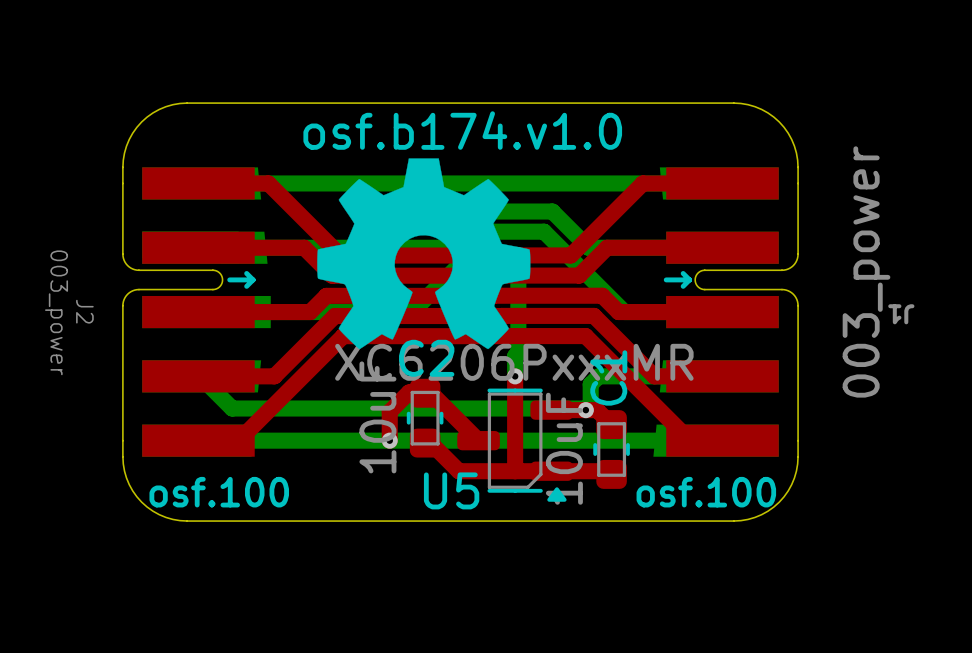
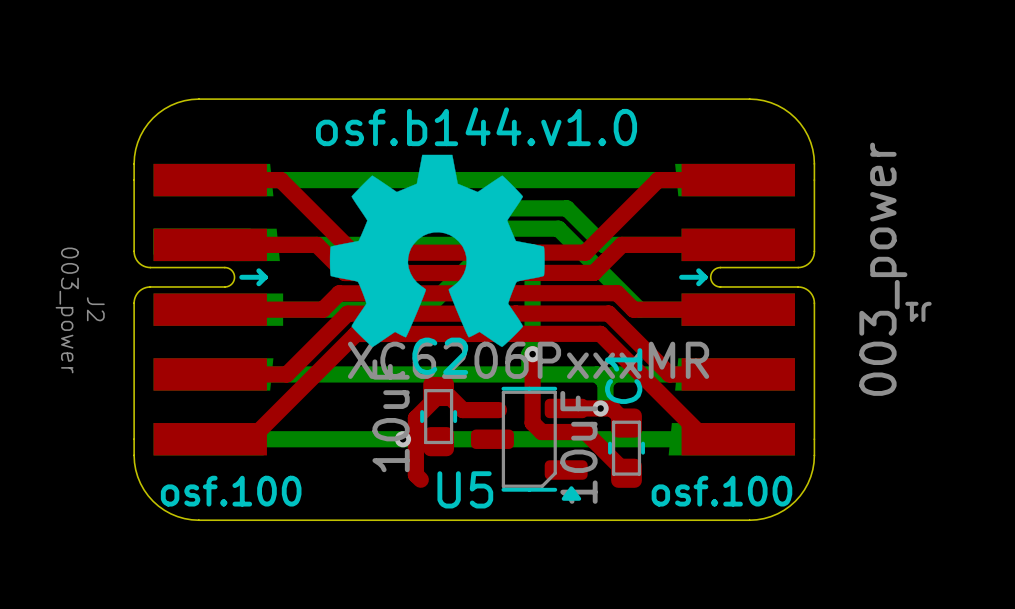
text: osf.b174.v1.0 (462, 130) -> osf.b144.v1.0 (476, 126)
bottom track: (200, 376) (232, 408) (587, 408) -> (211, 374) (597, 374) (605, 382)
top track: (515, 376) (515, 471) -> none
via position: (515, 376) -> (532, 354)
top track: none -> (498, 410) (462, 410) (443, 390) (415, 418) (415, 474) (420, 479)
top track: (389, 440) (389, 411) (409, 392) (430, 392) (478, 440) -> none
top track: (425, 443) (430, 443) (458, 471) (608, 471) -> (532, 354) (532, 422) (541, 432) (585, 432) (623, 470)

